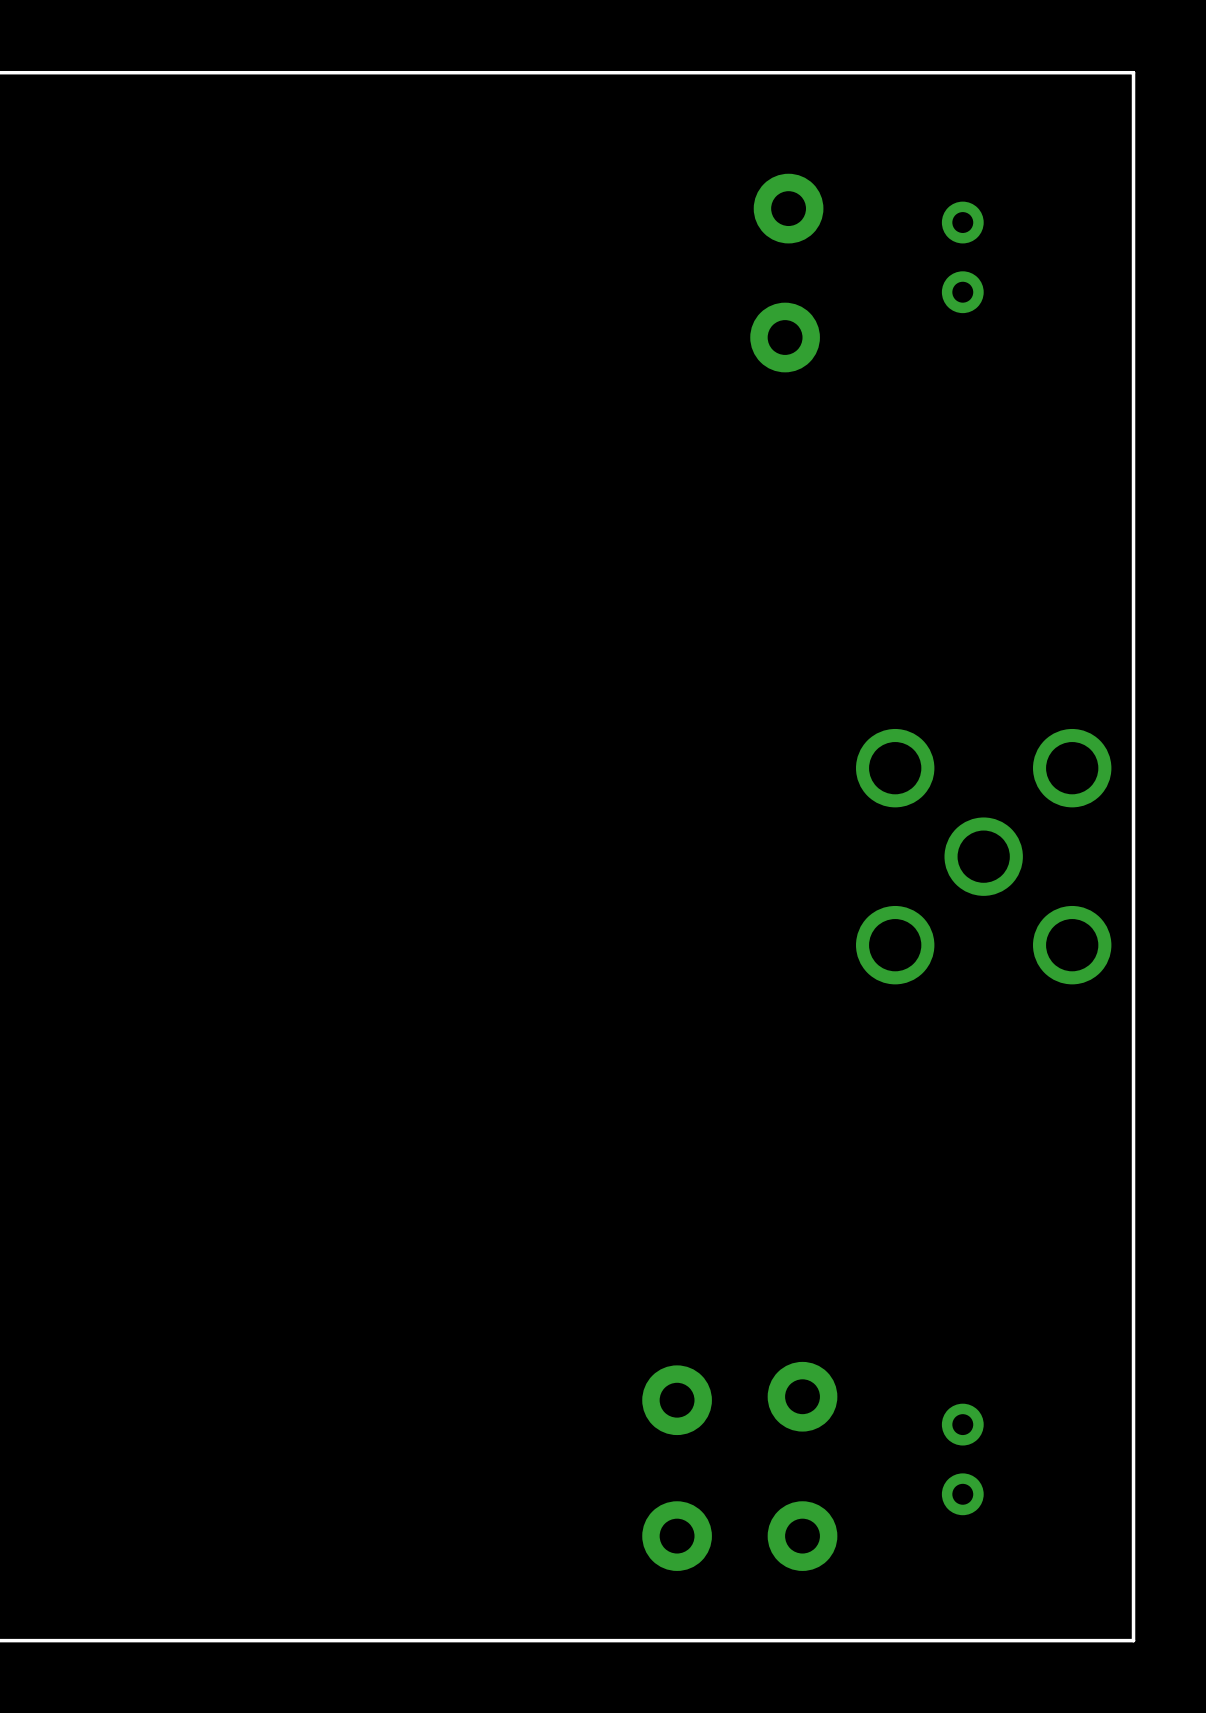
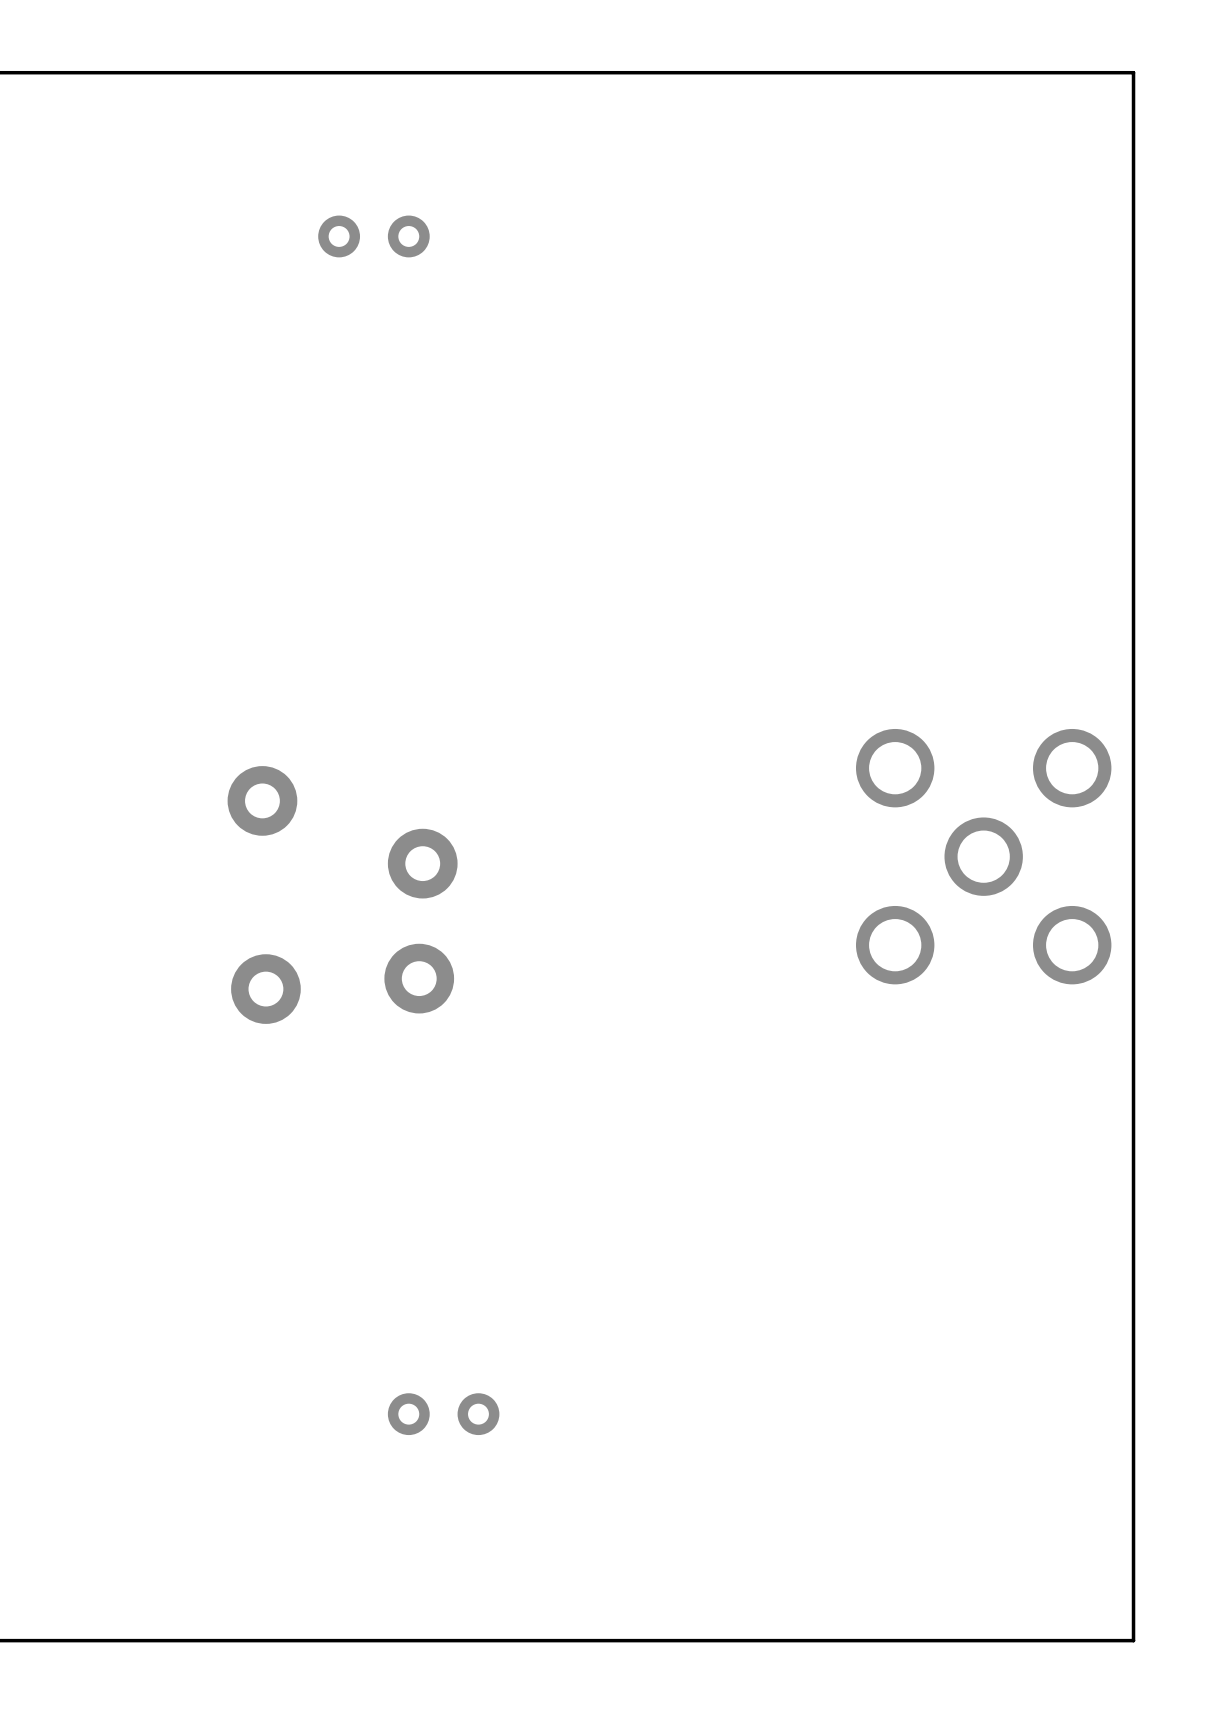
part: (788, 208) -> none
part rotation: 0° (962, 257) -> 90° clockwise (373, 236)
part position: (962, 257) -> (373, 236)
part: (785, 337) -> none
part: none -> (262, 800)
part: none -> (422, 863)
part: none -> (419, 978)
part: none -> (265, 989)
part: (802, 1396) -> none
part: (677, 1400) -> none
part rotation: 0° (962, 1459) -> 90° clockwise (443, 1414)
part position: (962, 1459) -> (443, 1414)
part: (677, 1536) -> none
part: (802, 1536) -> none

